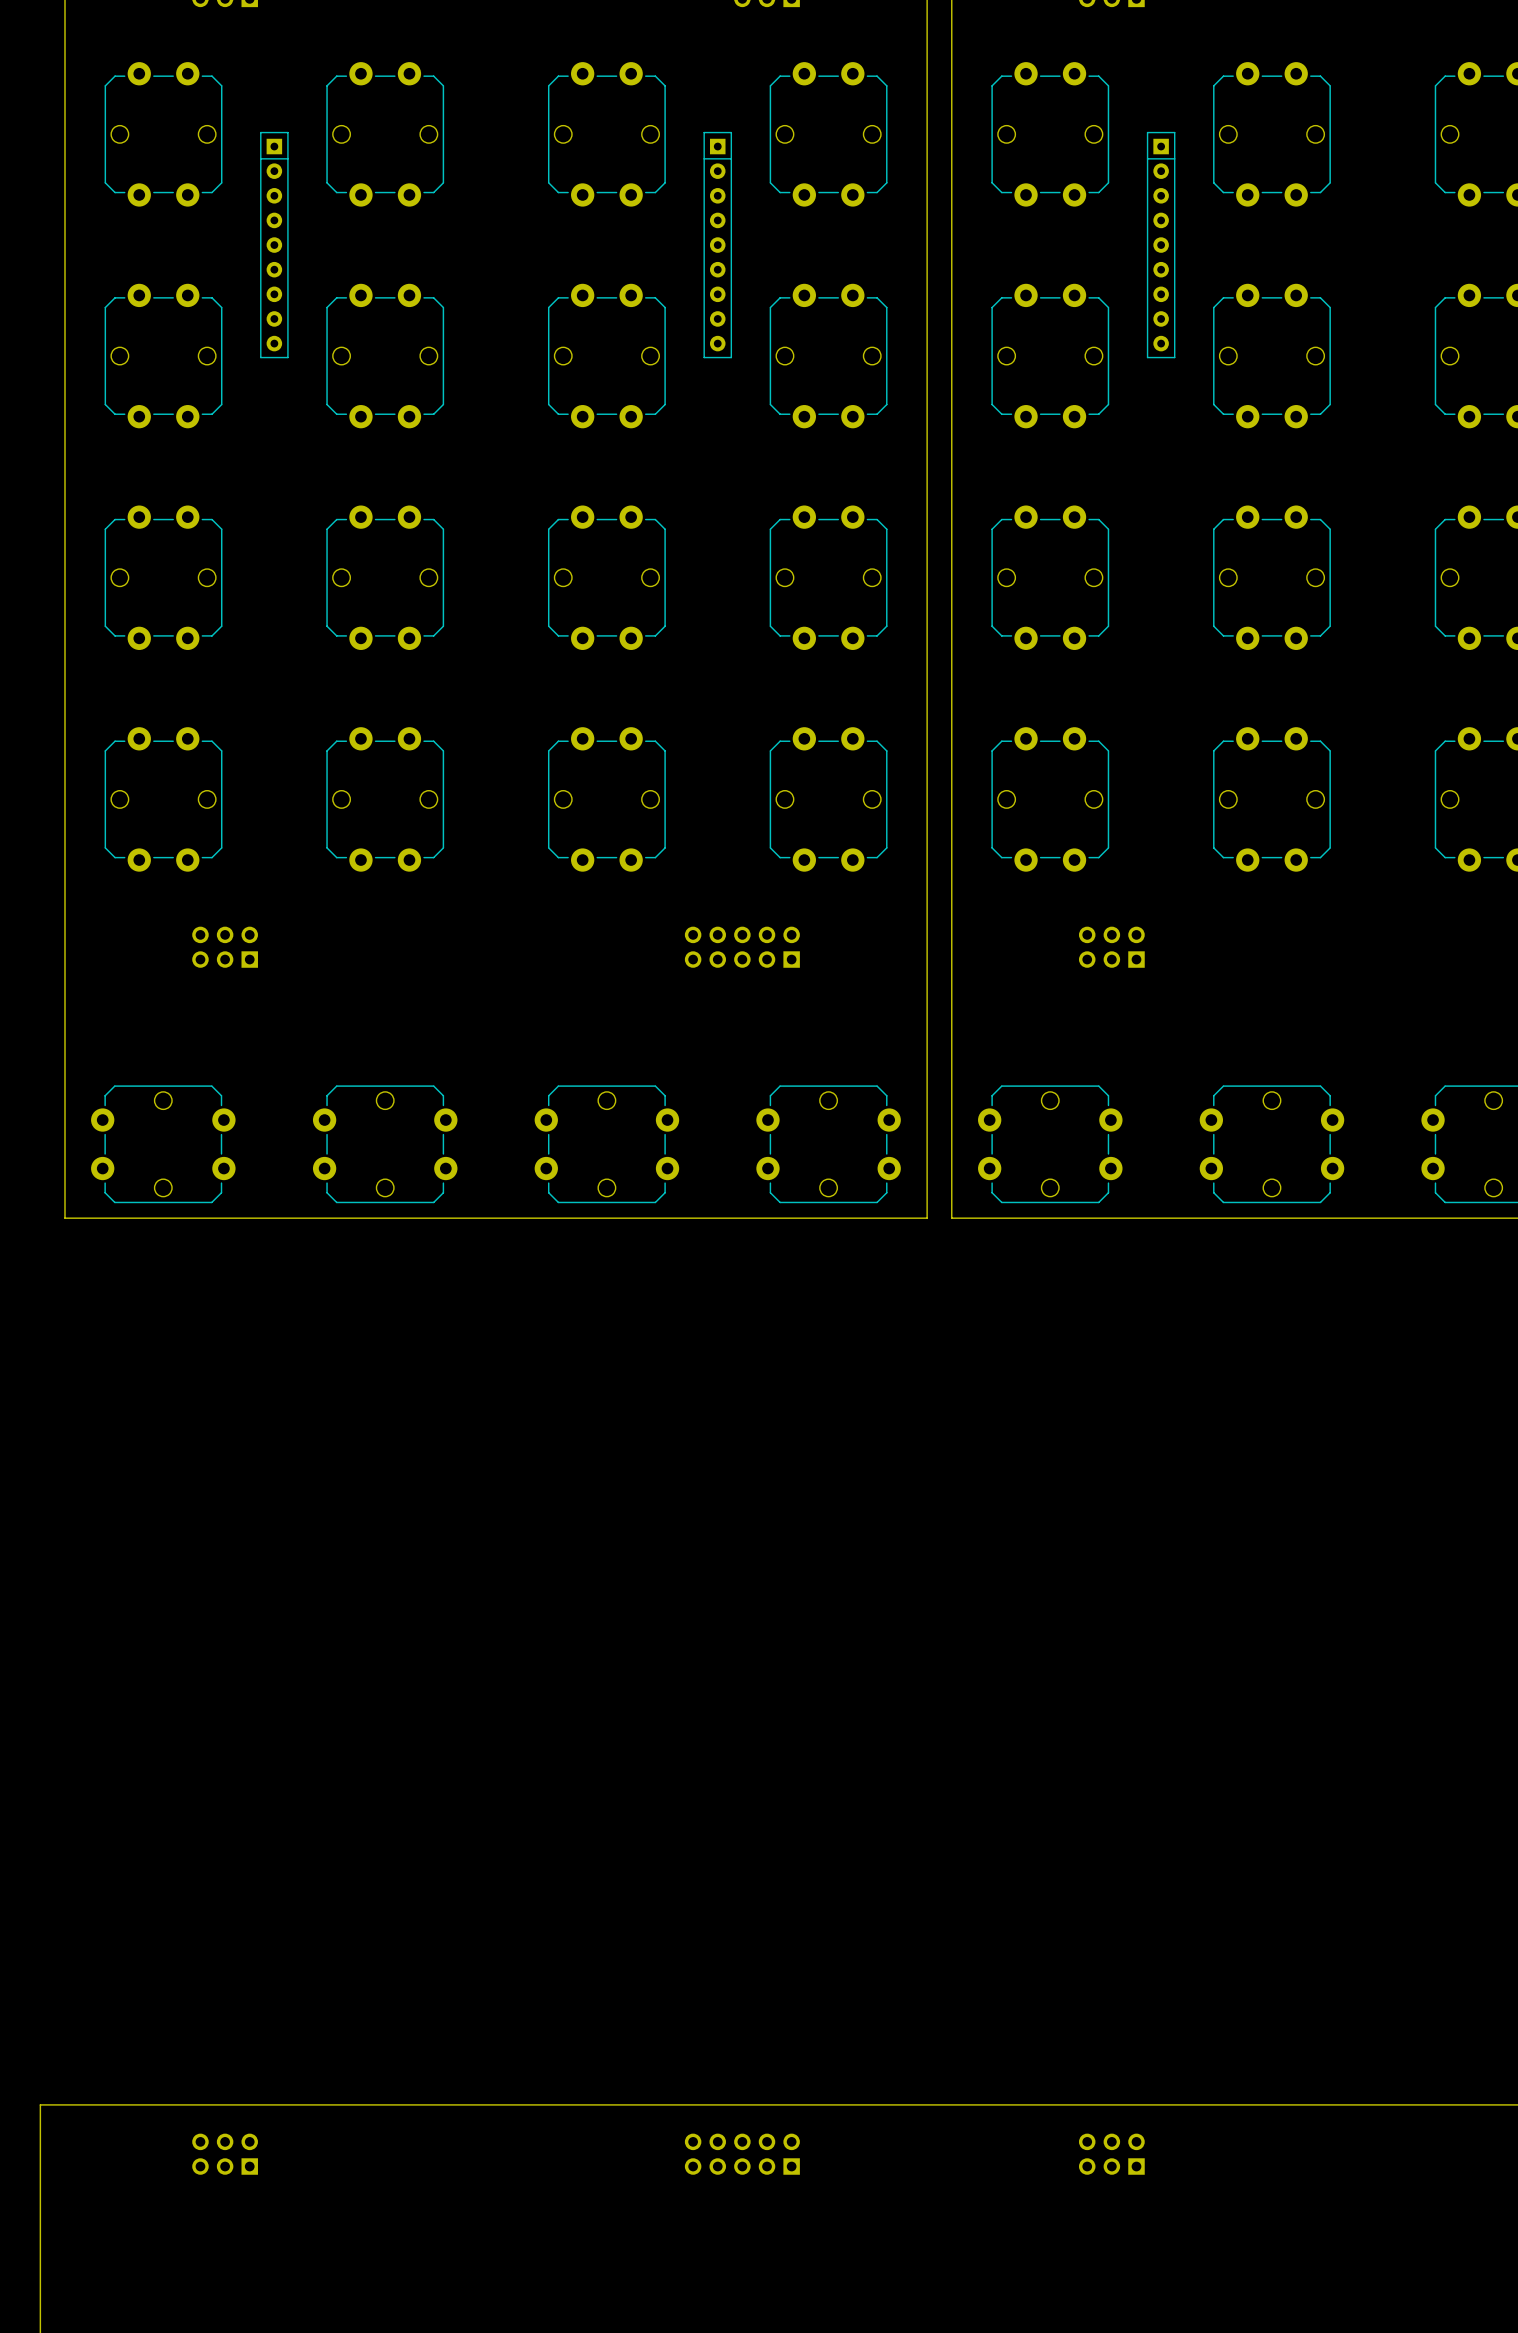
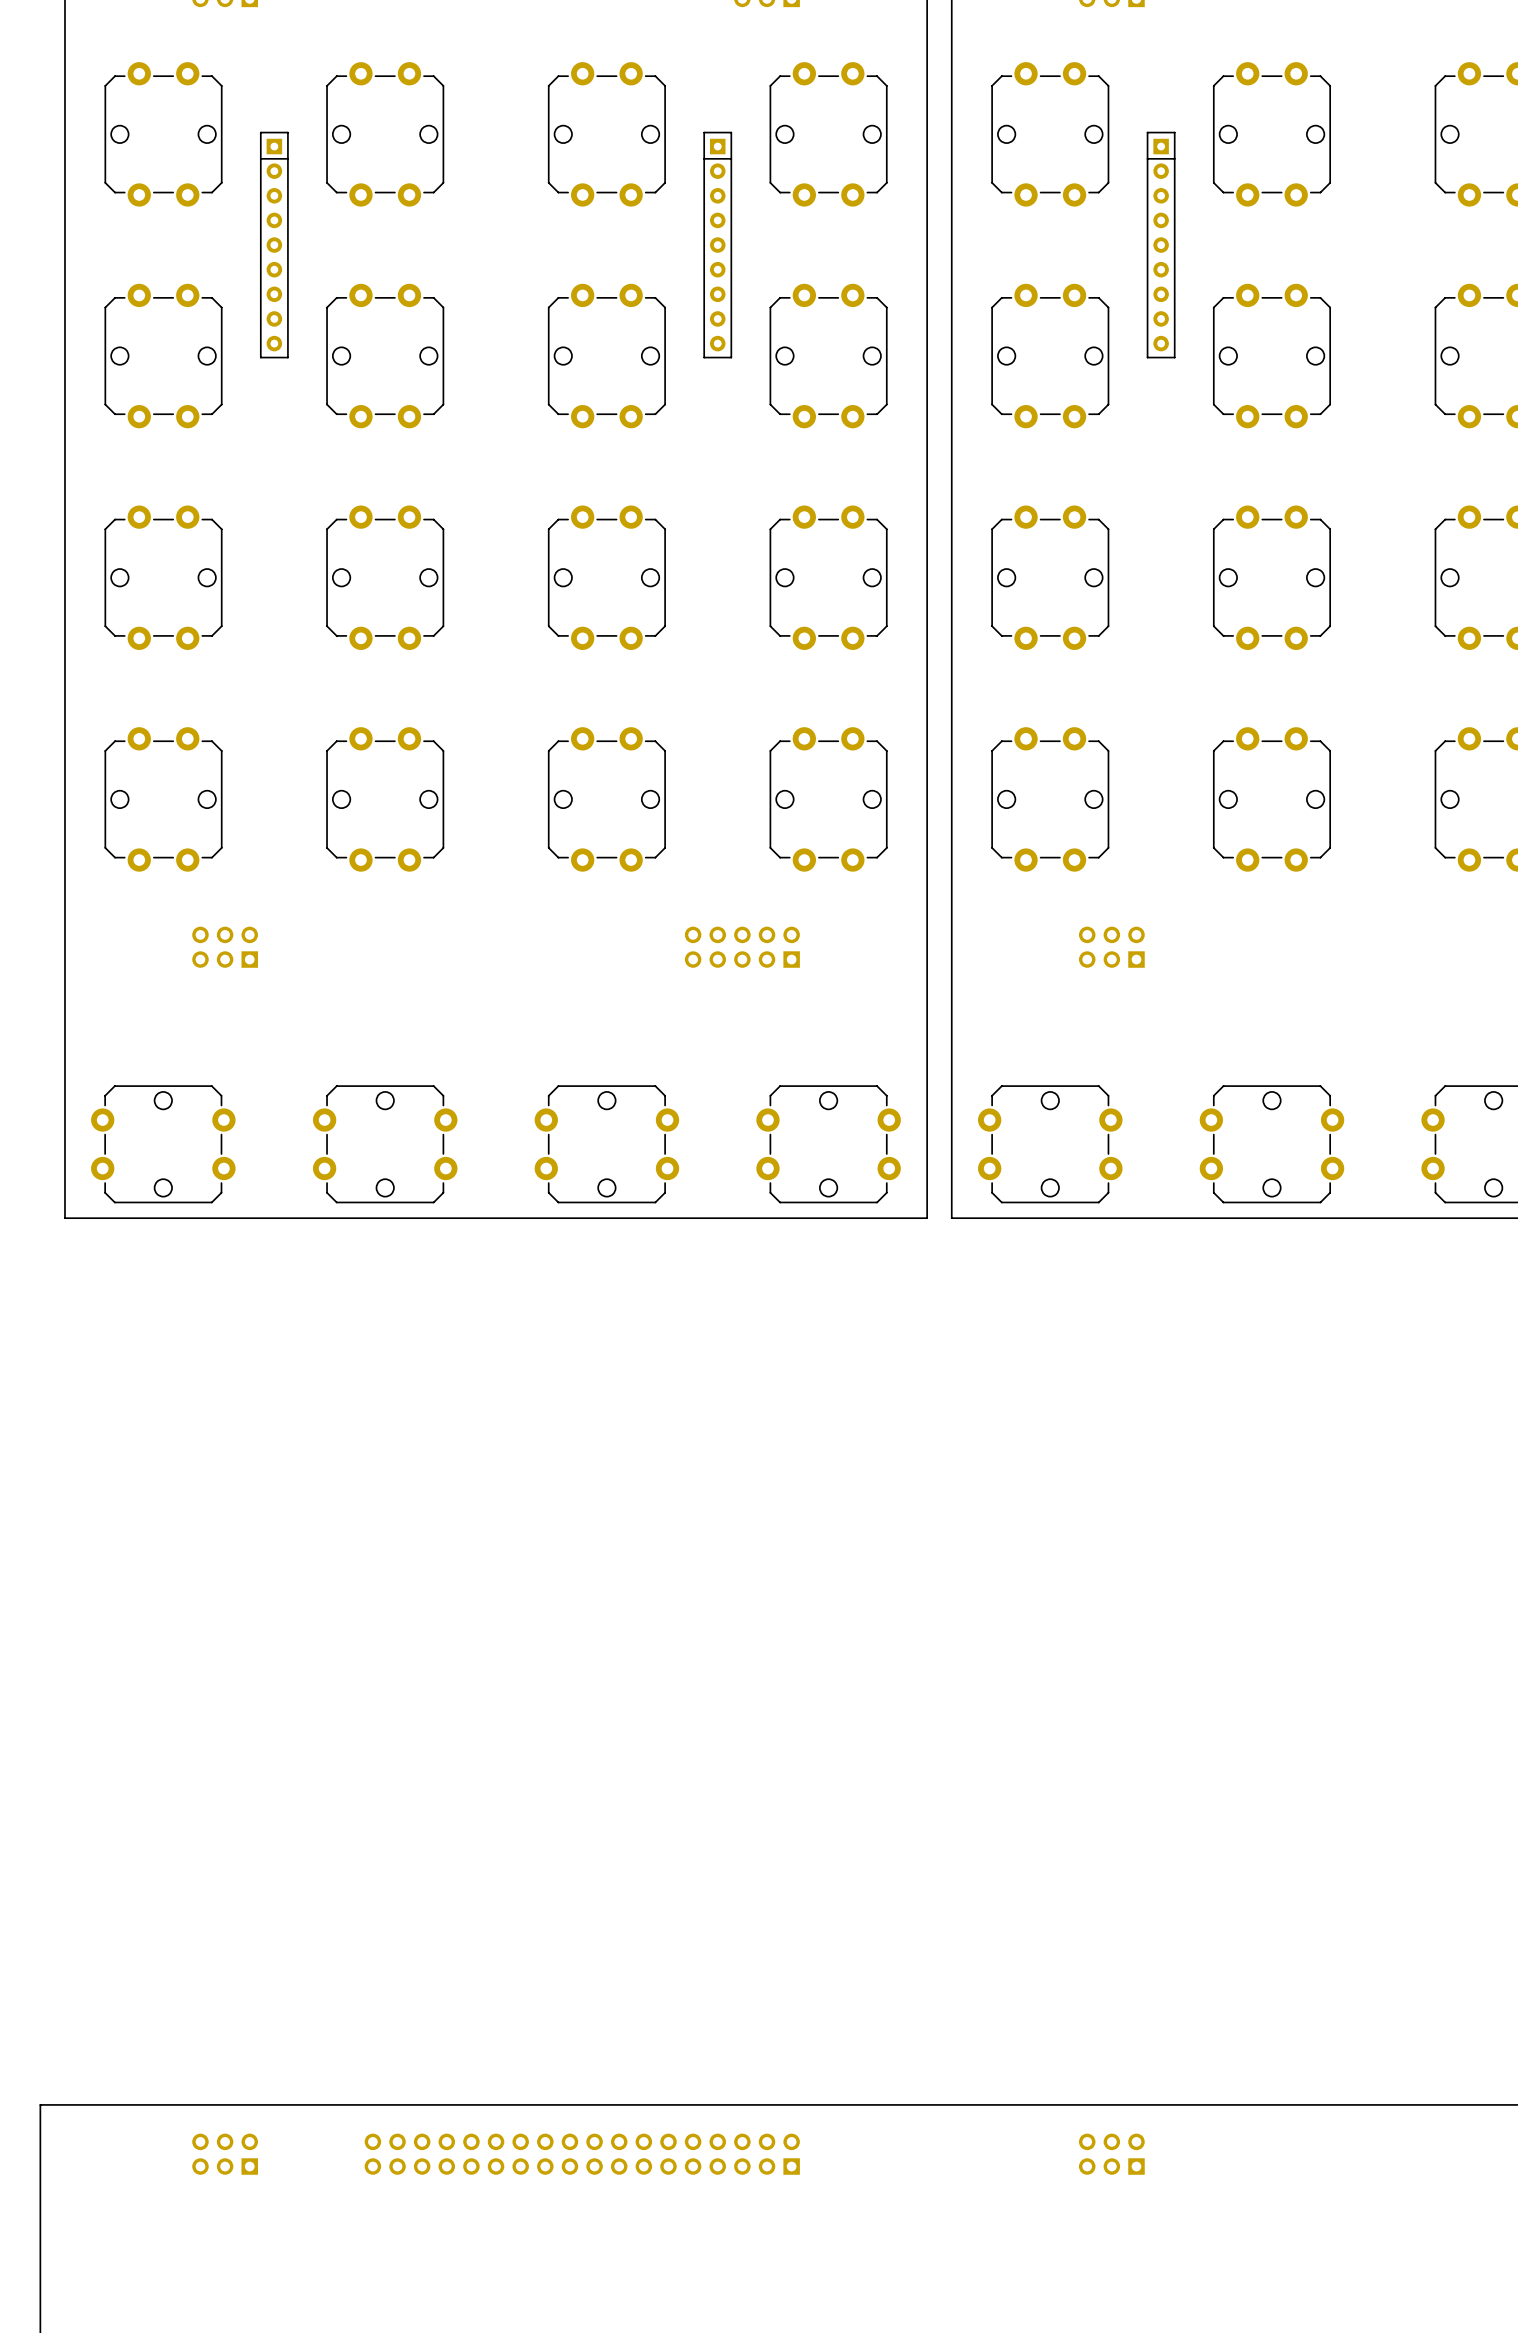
part: none -> (582, 2154)

